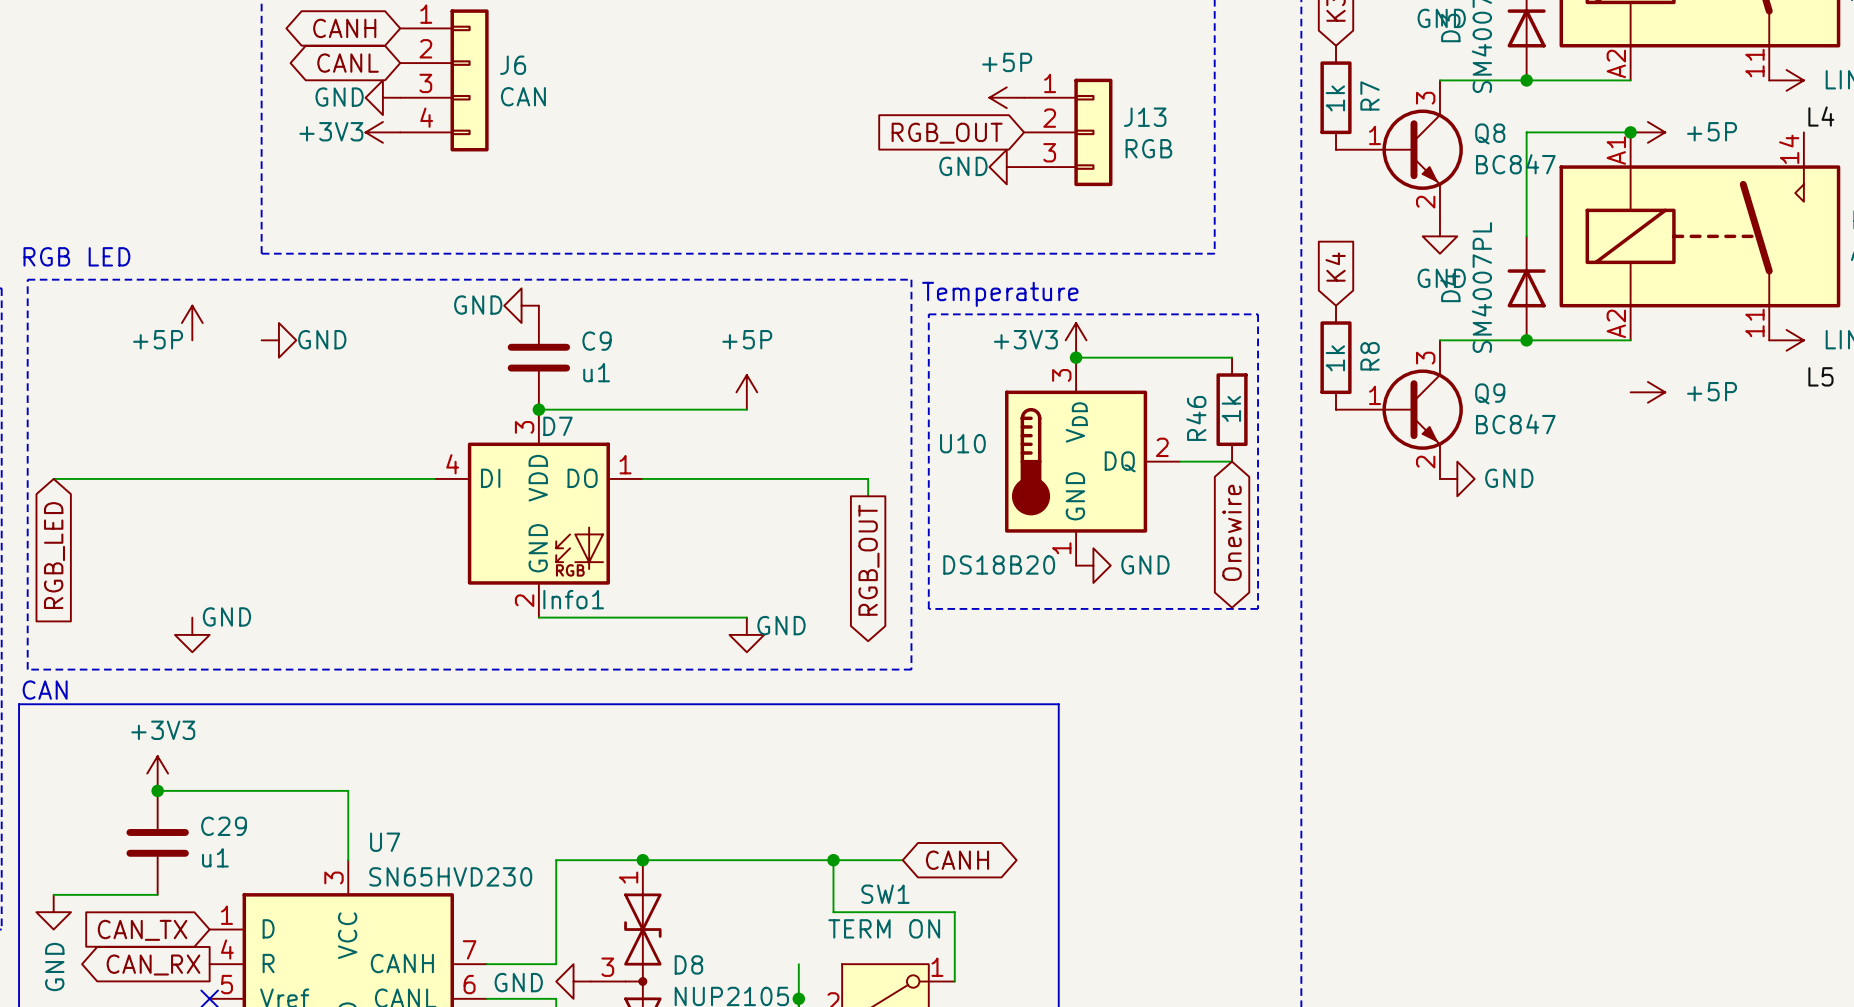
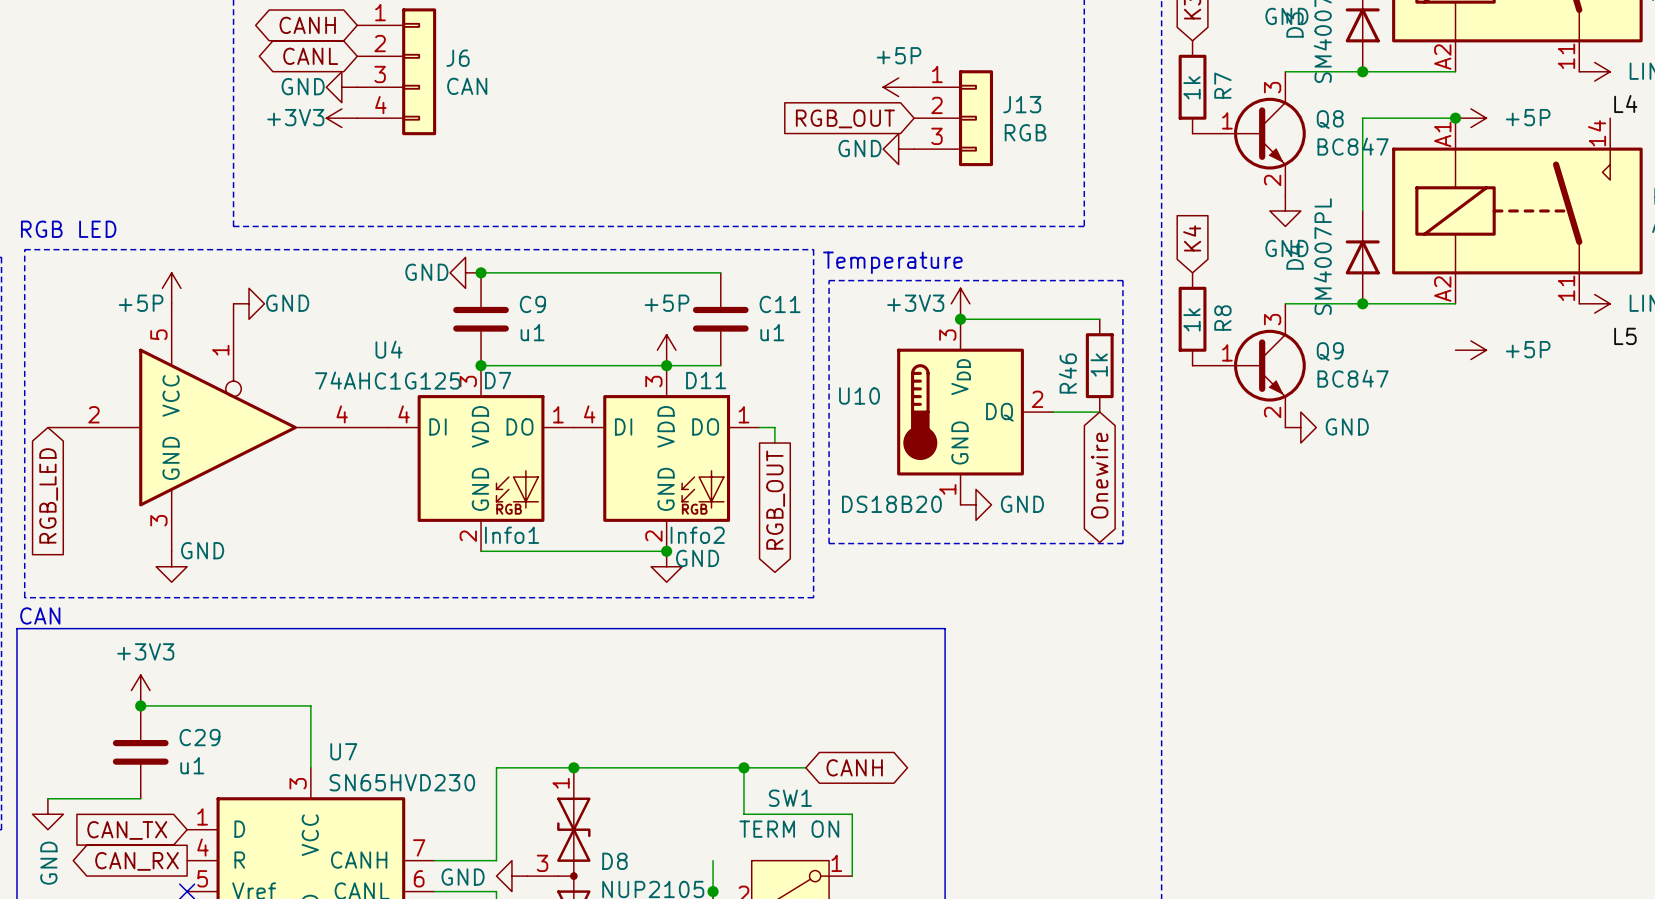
wire: none -> (481, 272) (720, 272)
junction: none -> (481, 272)
C11: none -> u1 (720, 319)
wire: none -> (666, 365) (720, 365)
junction: none -> (666, 365)
U4: none -> 74AHC1G125 (218, 427)
D11: none -> Info2 (666, 458)
junction: none -> (666, 551)

